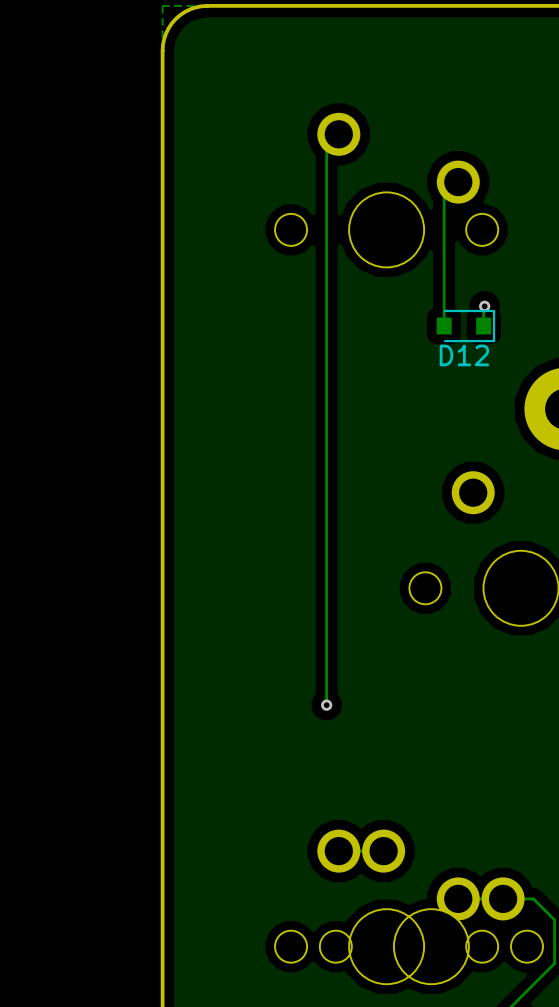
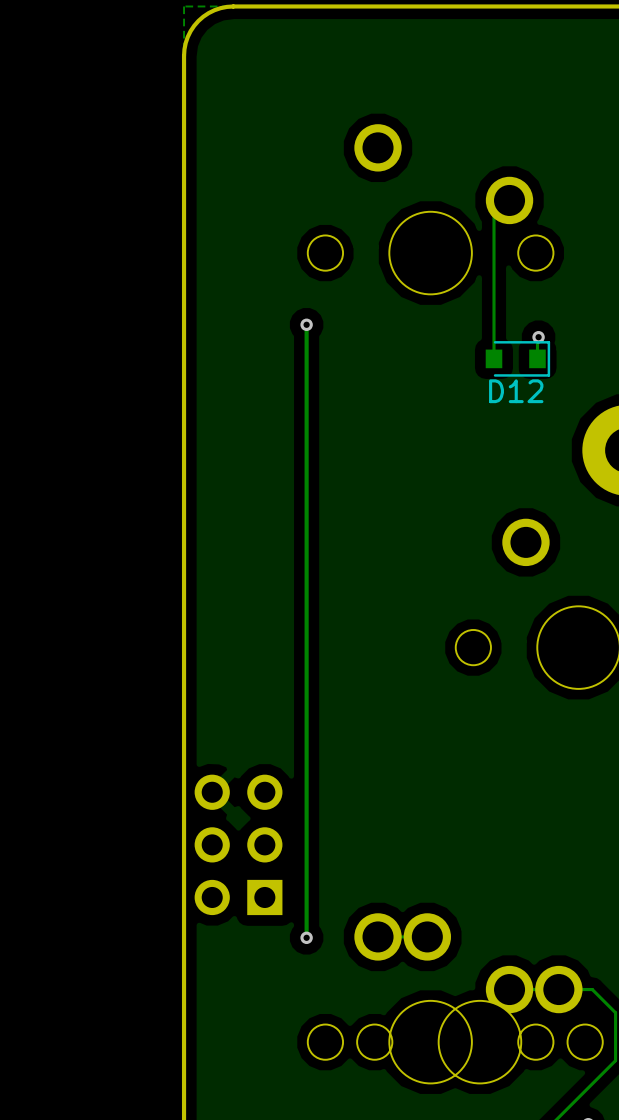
track: (338, 134) (326, 146) (326, 705) -> none
track: none -> (306, 324) (306, 937)
via: none -> (306, 324)
via: (326, 705) -> none
part: none -> (238, 844)
via: none -> (306, 937)

